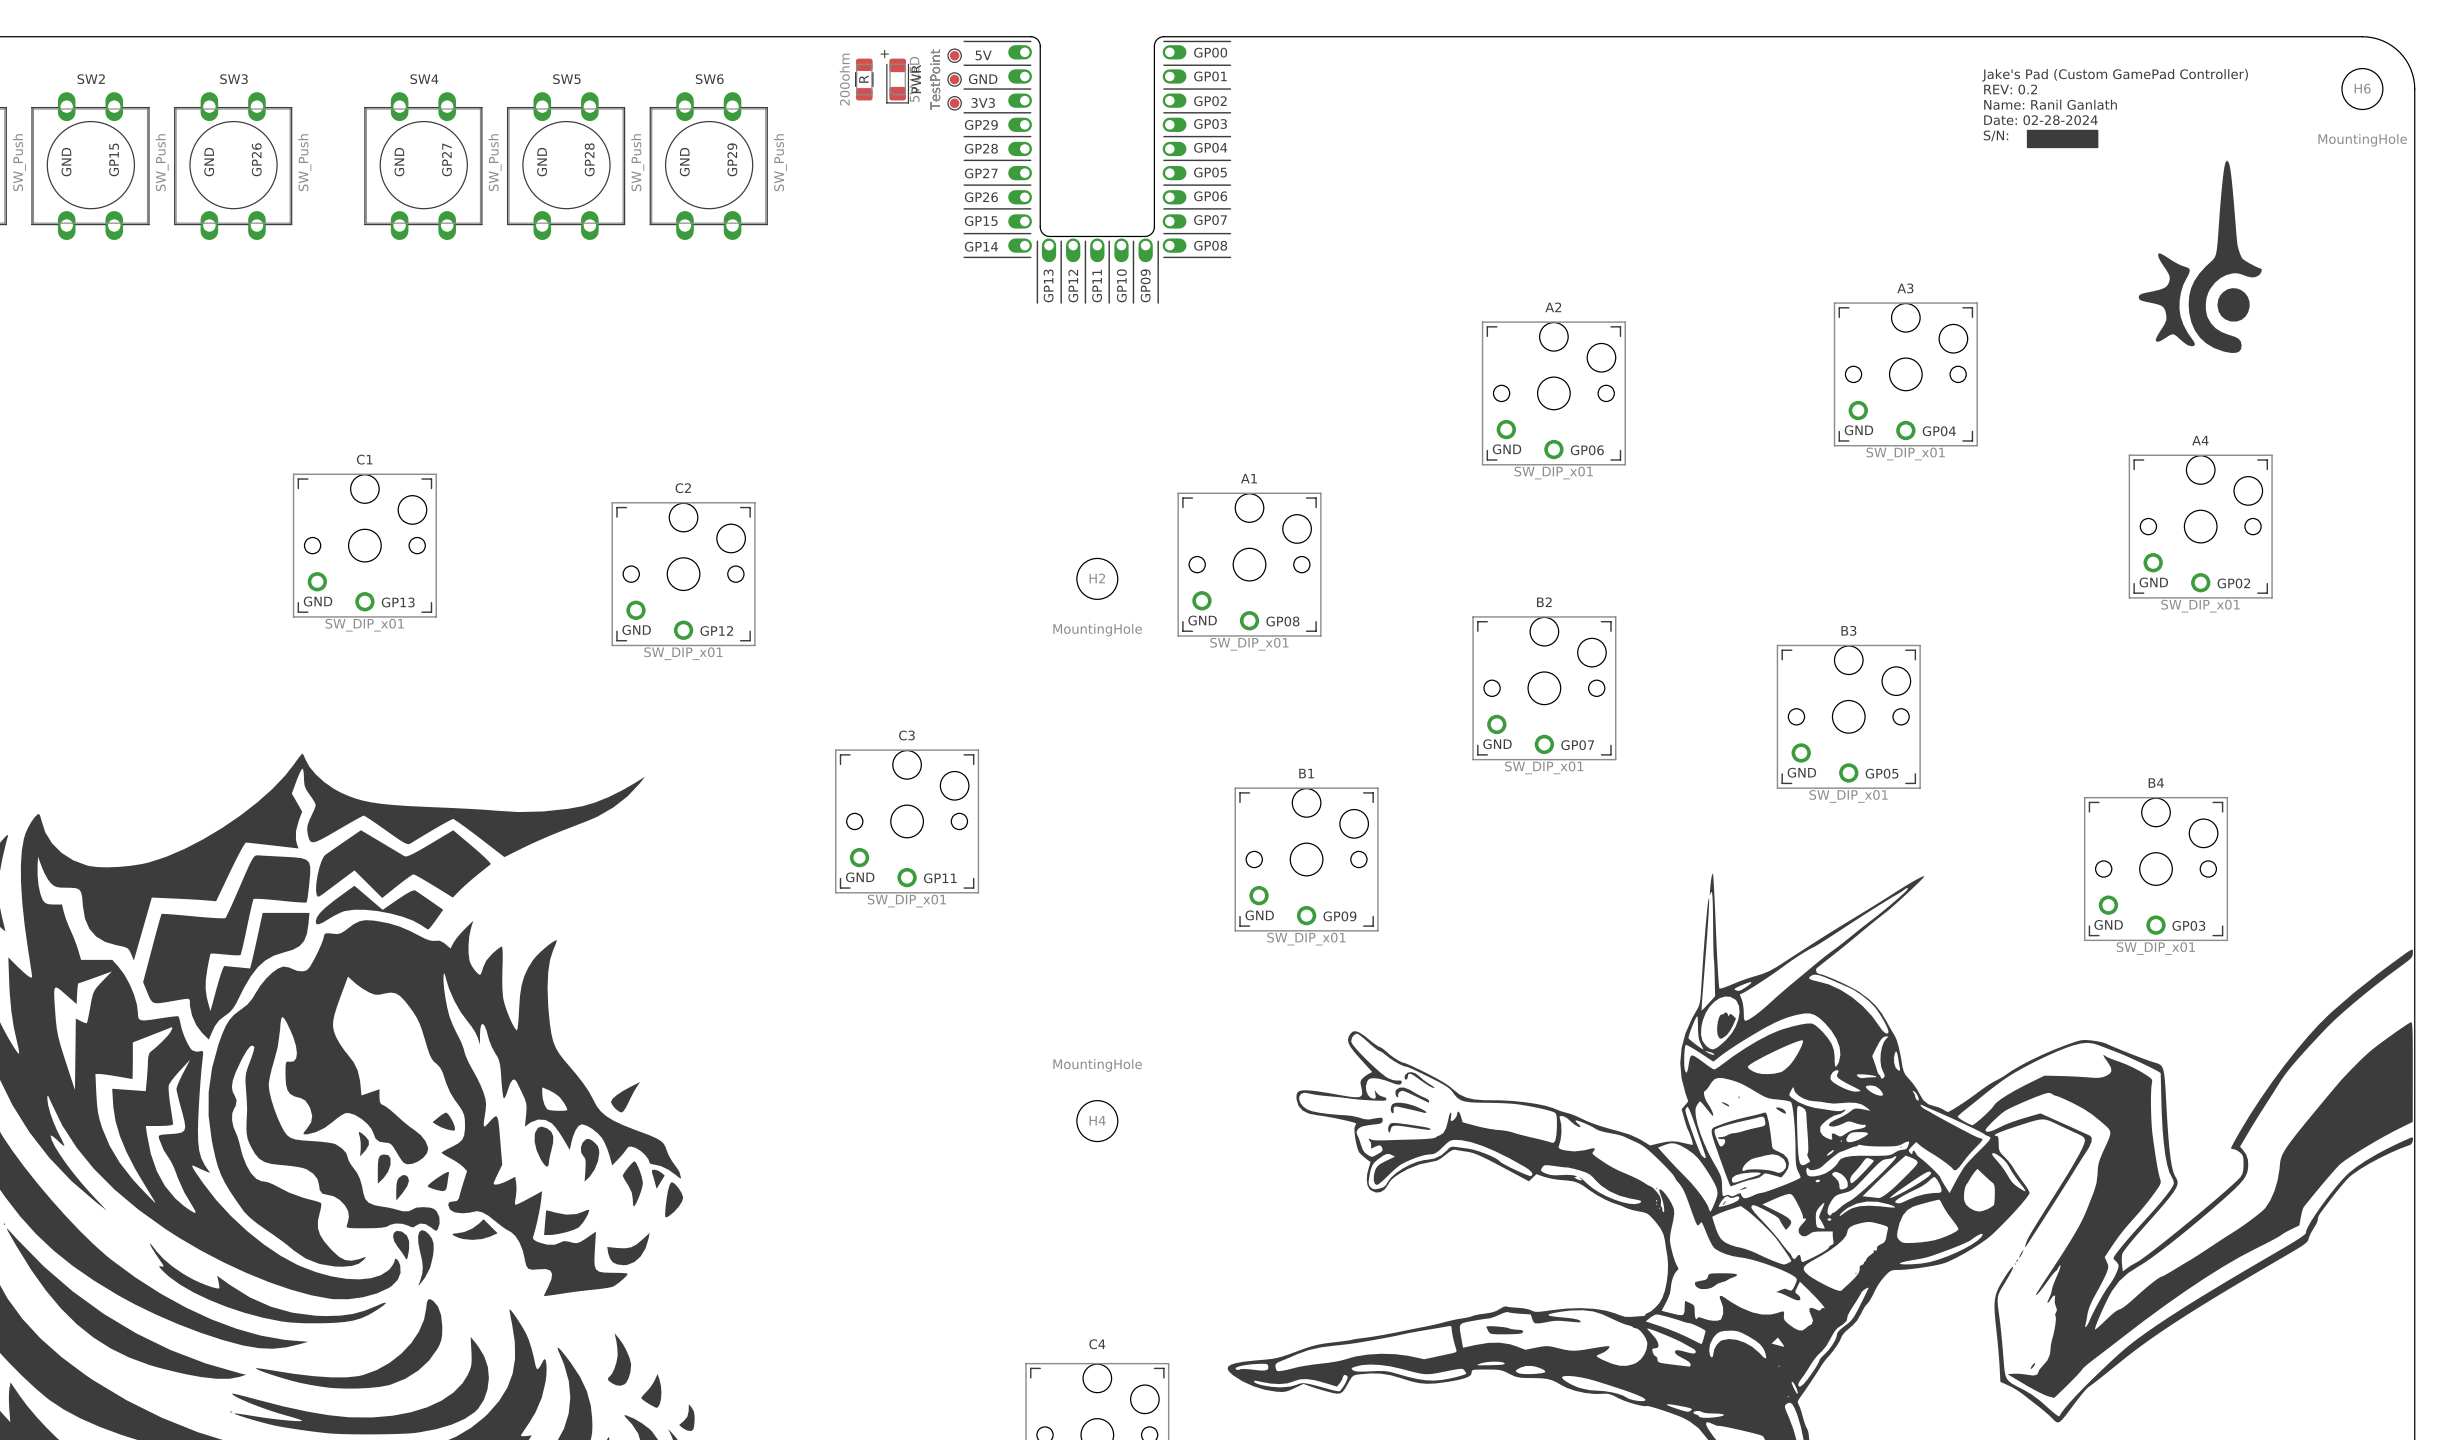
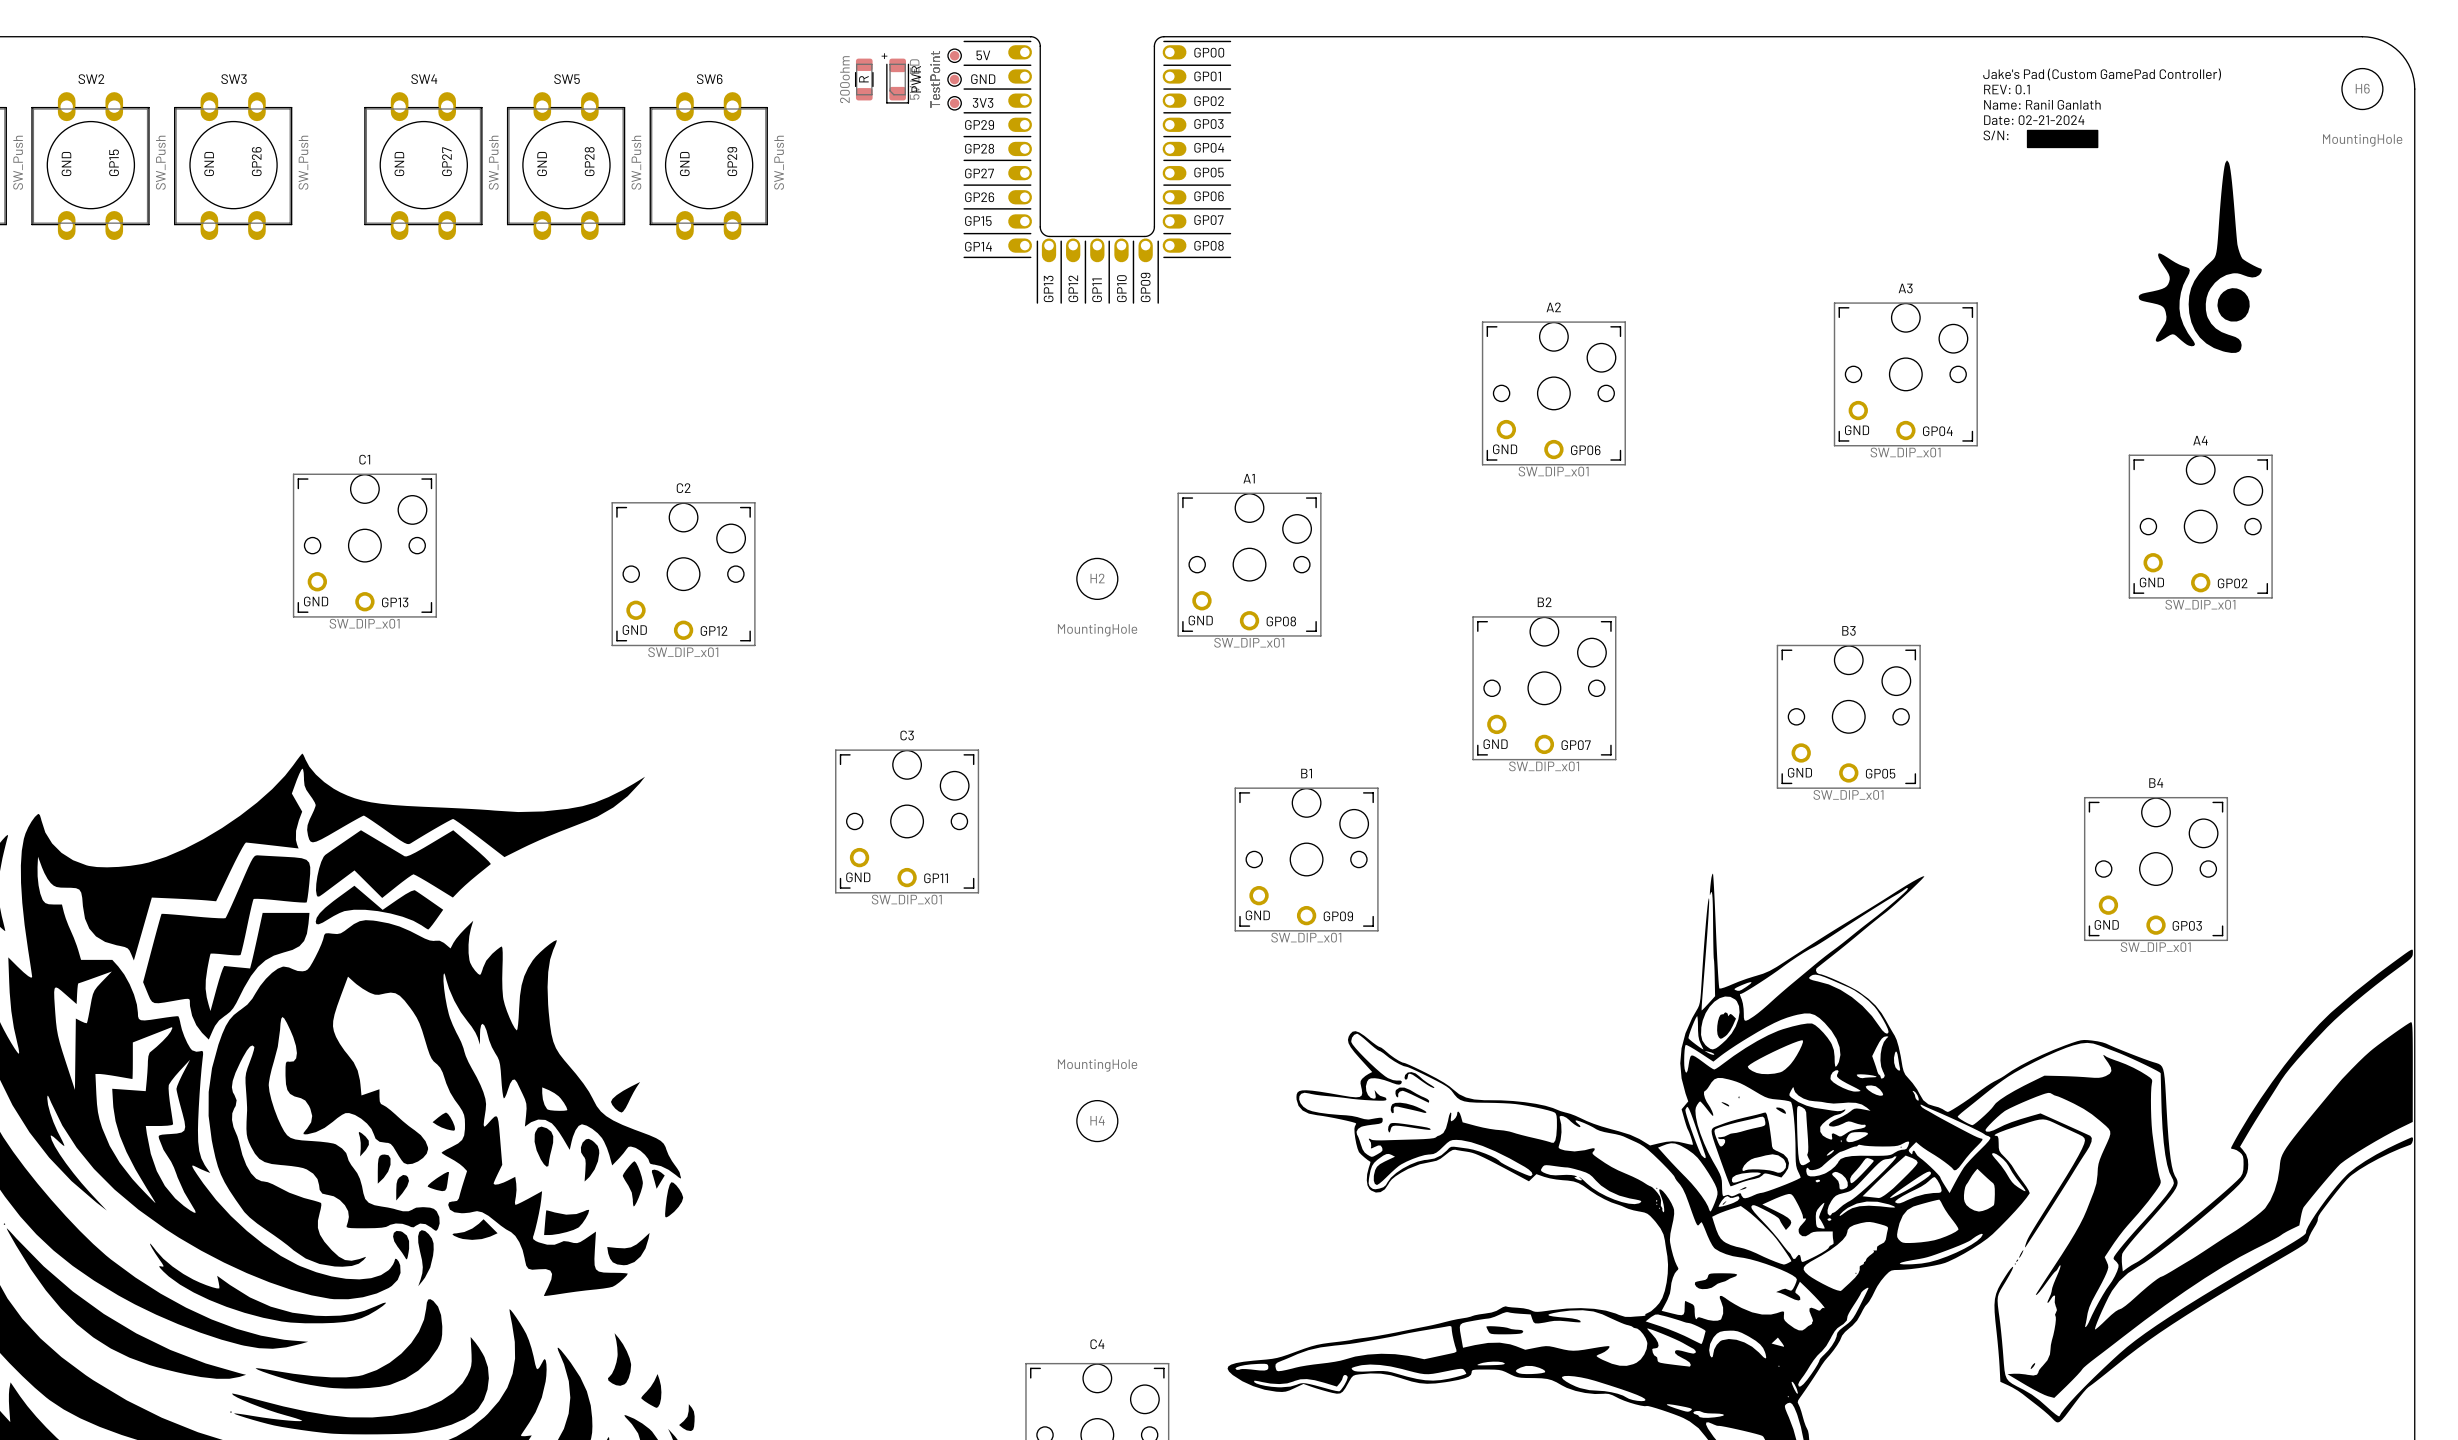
text: REV: 0.2 (2010, 89) -> REV: 0.1 (2006, 89)
text: Date: 02-28-2024 (2040, 120) -> Date: 02-21-2024 (2034, 120)

